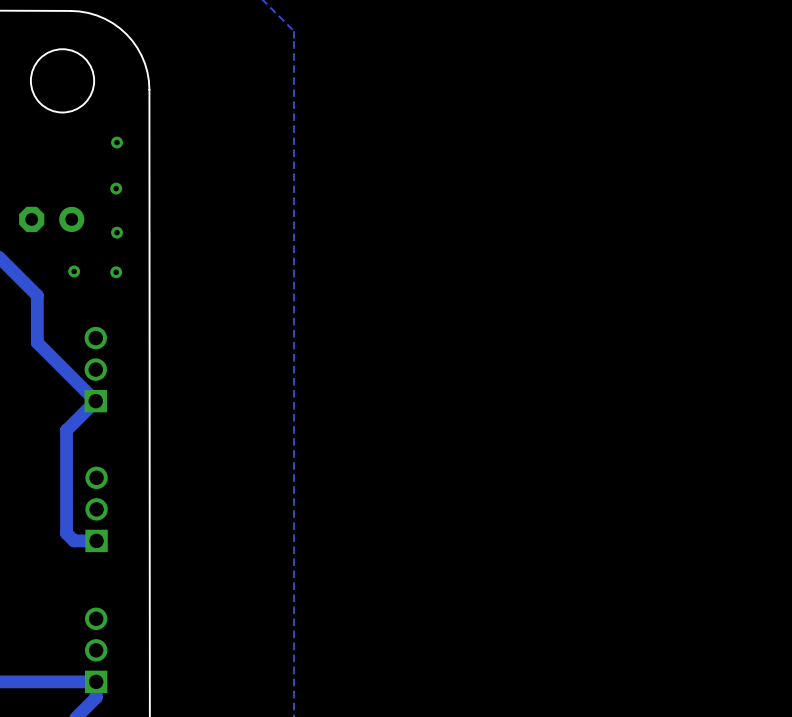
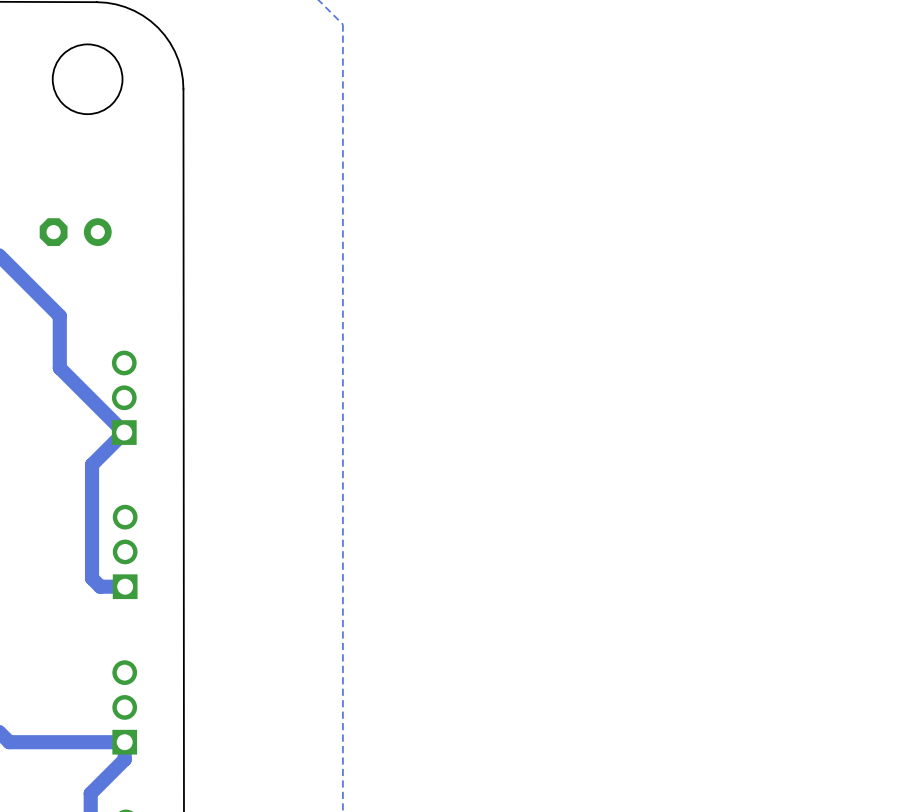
via: (117, 142) -> none
via: (116, 188) -> none
via: (117, 232) -> none
via: (74, 271) -> none
via: (116, 272) -> none

